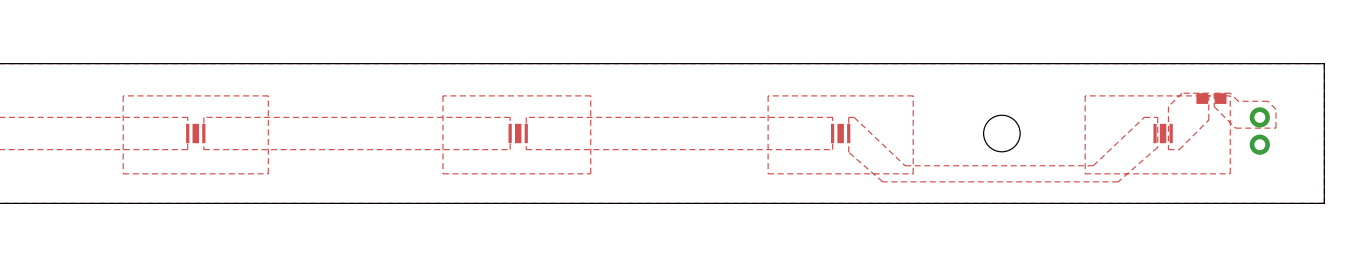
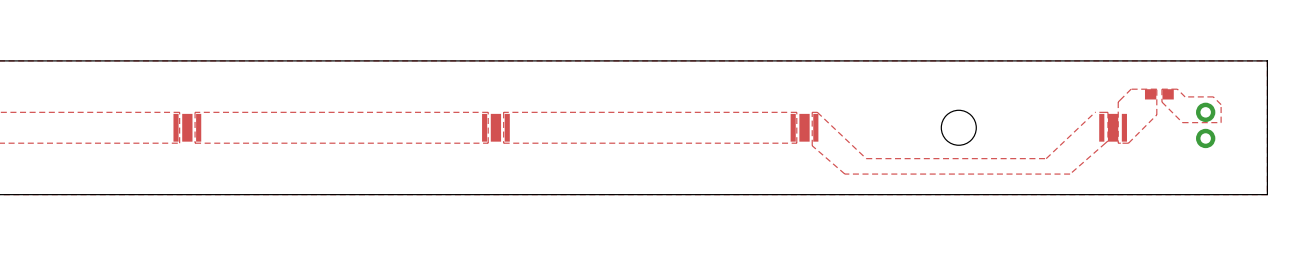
top zone outline: (268, 95) (123, 95) (123, 173) (268, 173) (268, 95) -> none
top zone outline: (590, 95) (442, 95) (442, 173) (590, 173) (590, 95) -> none
top zone outline: (913, 95) (768, 95) (768, 173) (913, 173) (913, 95) -> none
top zone outline: (1230, 95) (1085, 95) (1085, 173) (1230, 173) (1230, 95) -> none
part footprint: [186, 123, 206, 144] -> [173, 113, 202, 142]
part footprint: [508, 123, 528, 144] -> [482, 113, 510, 142]
part footprint: [830, 123, 851, 144] -> [790, 113, 819, 142]
part footprint: [1153, 123, 1173, 144] -> [1099, 113, 1127, 142]

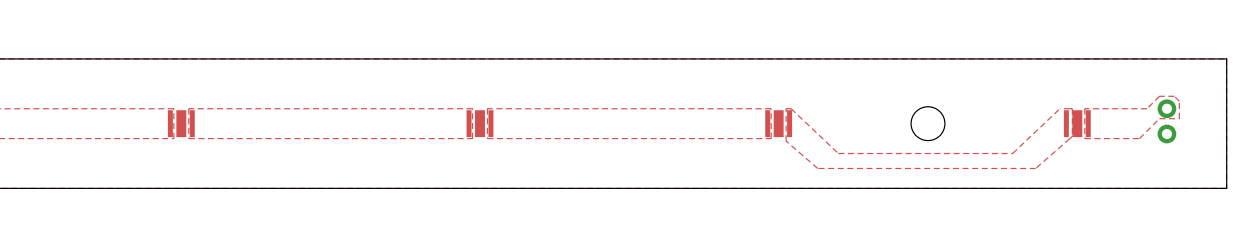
part: (1159, 94) -> none
top zone outline: (1218, 122) (1221, 122) (1221, 104) (1213, 96) (1185, 96) (1177, 89) (1161, 89) (1161, 102) (1182, 122) (1197, 122) -> (1179, 118) (1179, 101) (1174, 96) (1159, 96) (1147, 108) (1084, 108) (1084, 138)
top zone outline: (1128, 143) (1156, 114) (1156, 89) (1131, 89) (1118, 102) (1118, 143) (1120, 143) -> (1092, 138) (1139, 138) (1159, 118)

